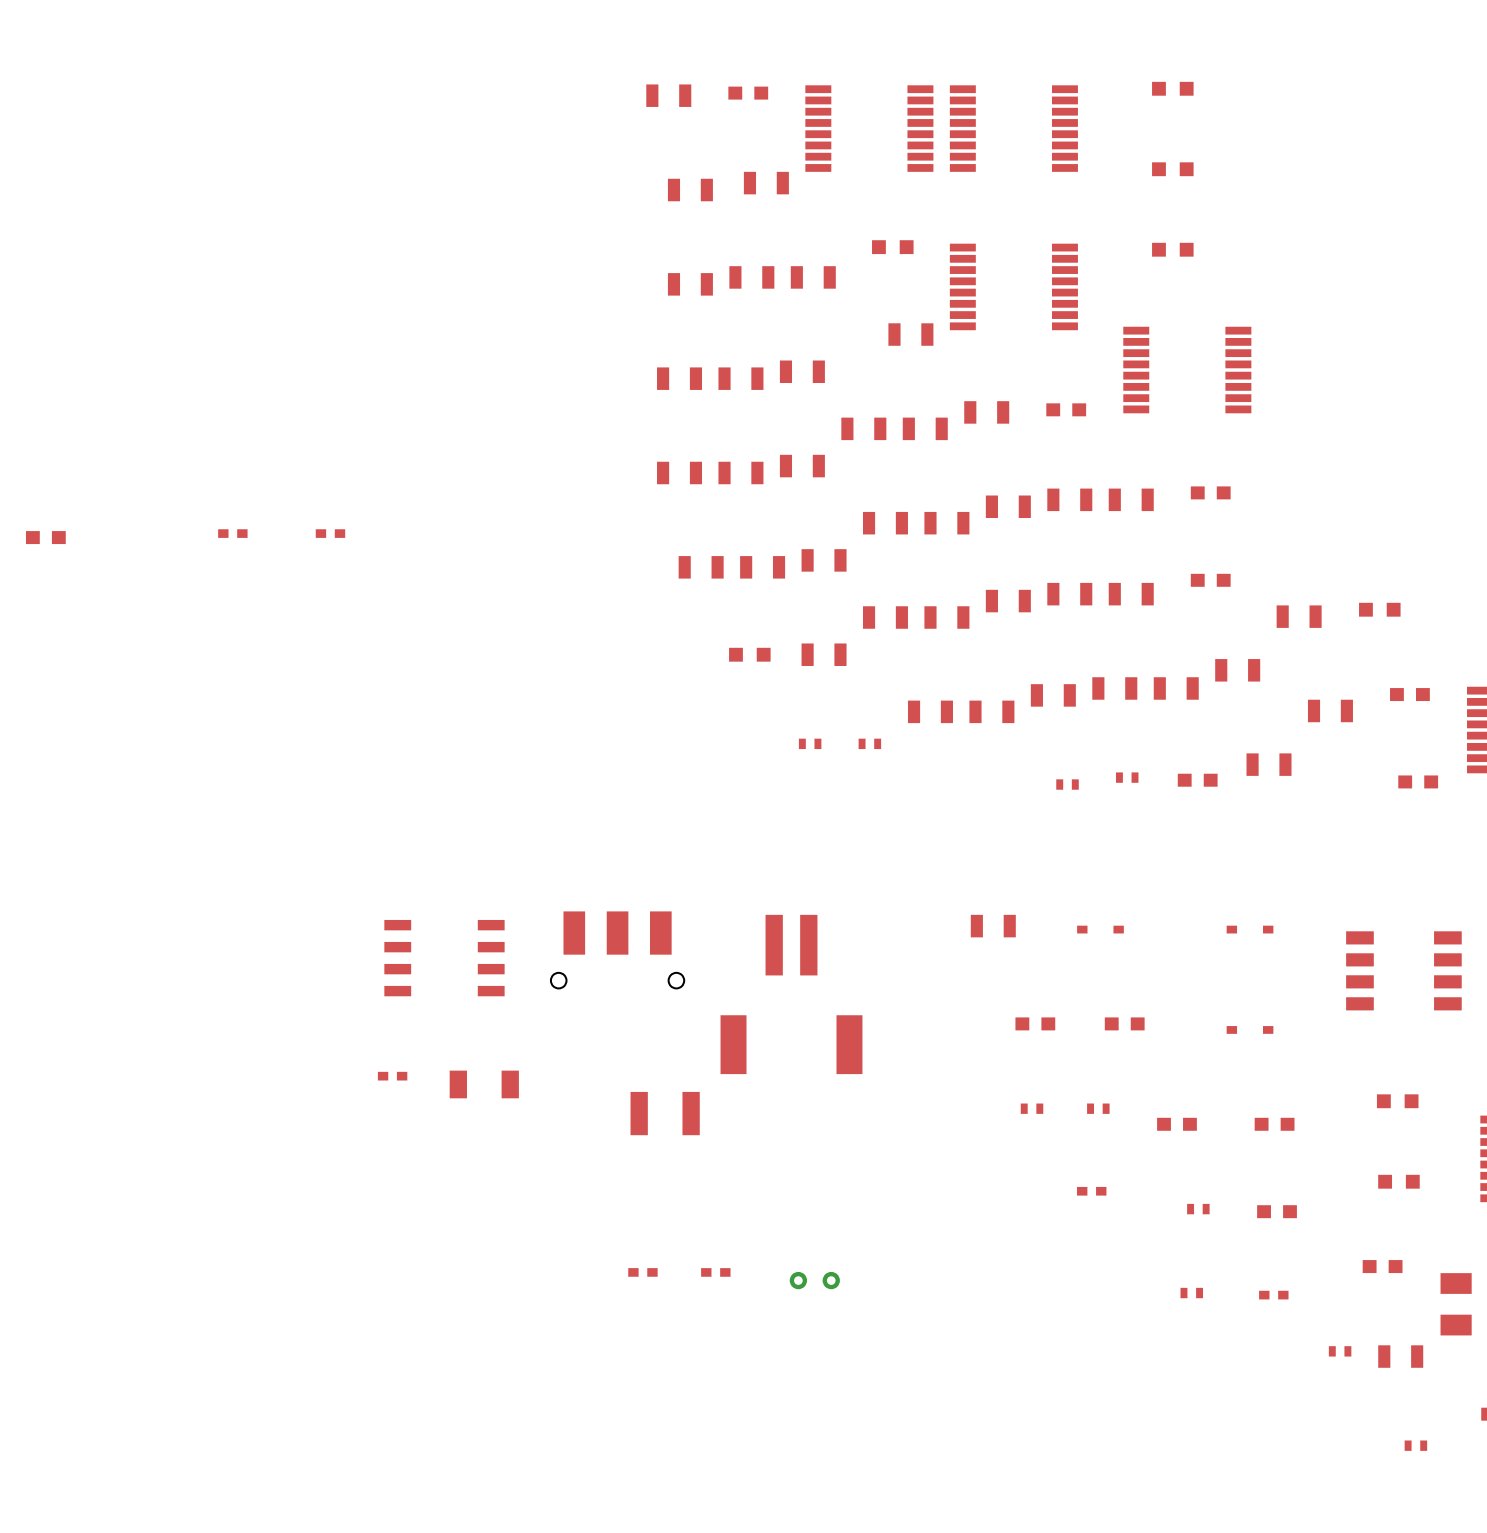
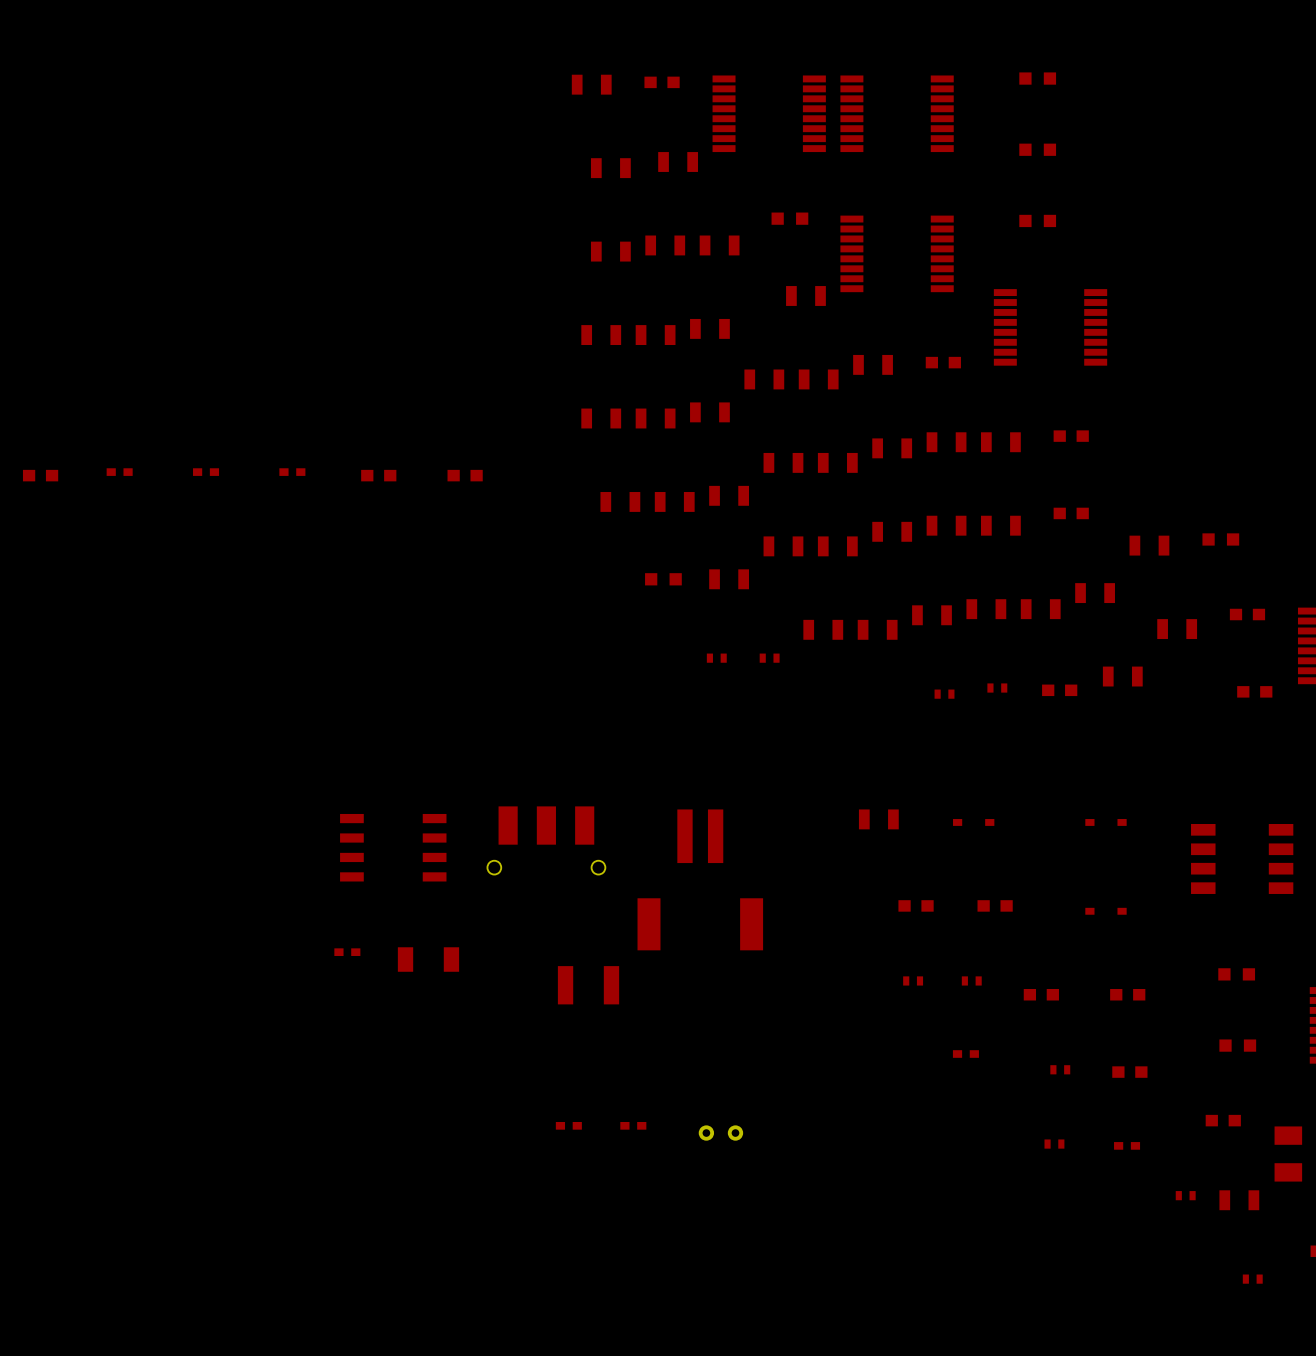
part: none -> (119, 472)
part: none -> (378, 475)
part: none -> (465, 475)

